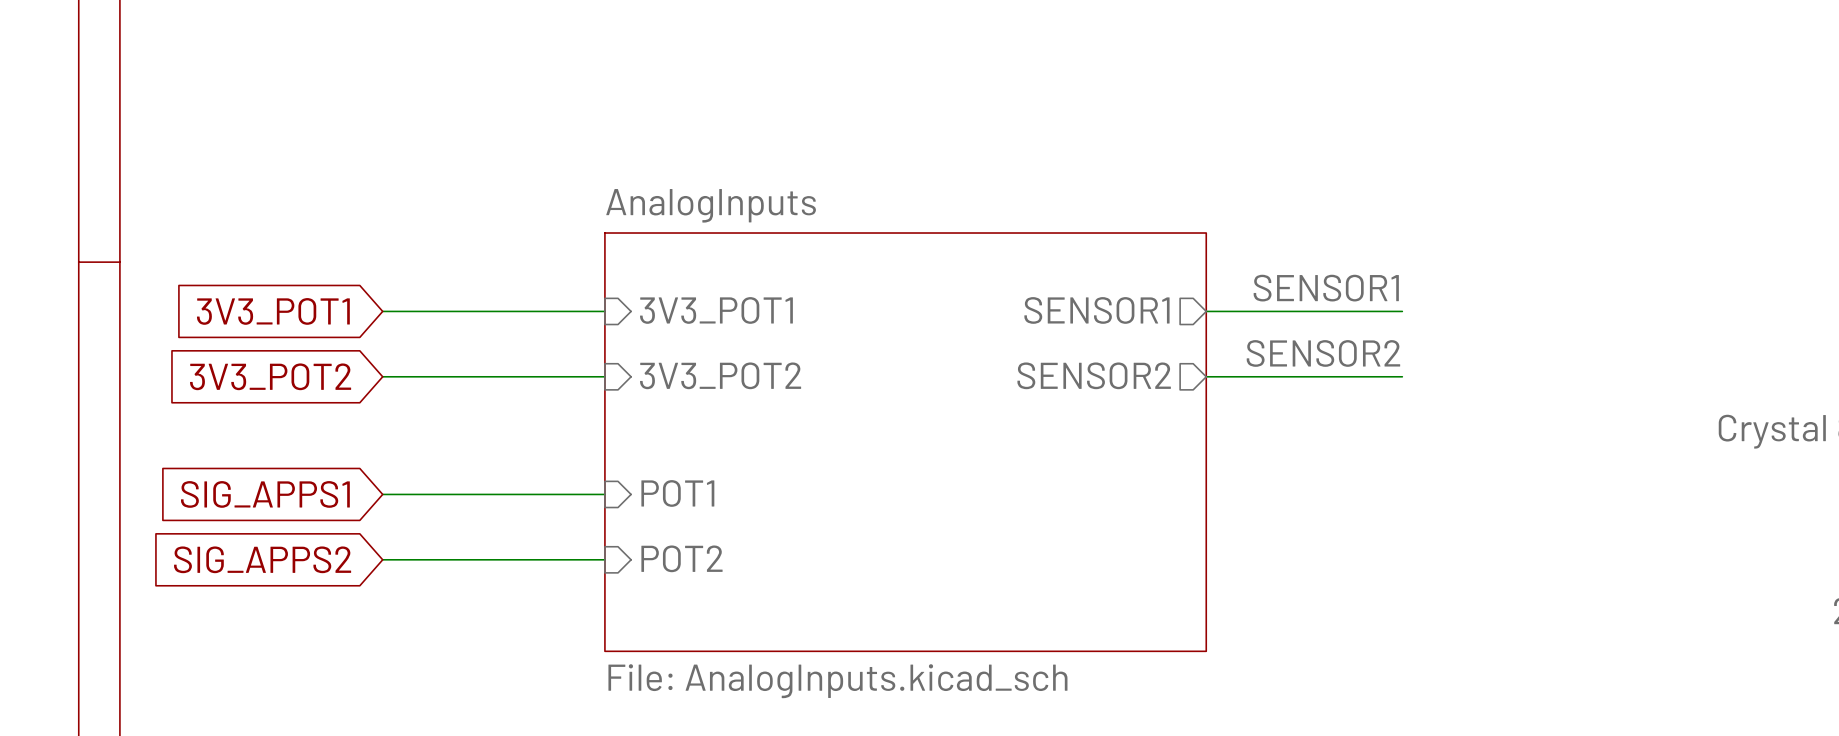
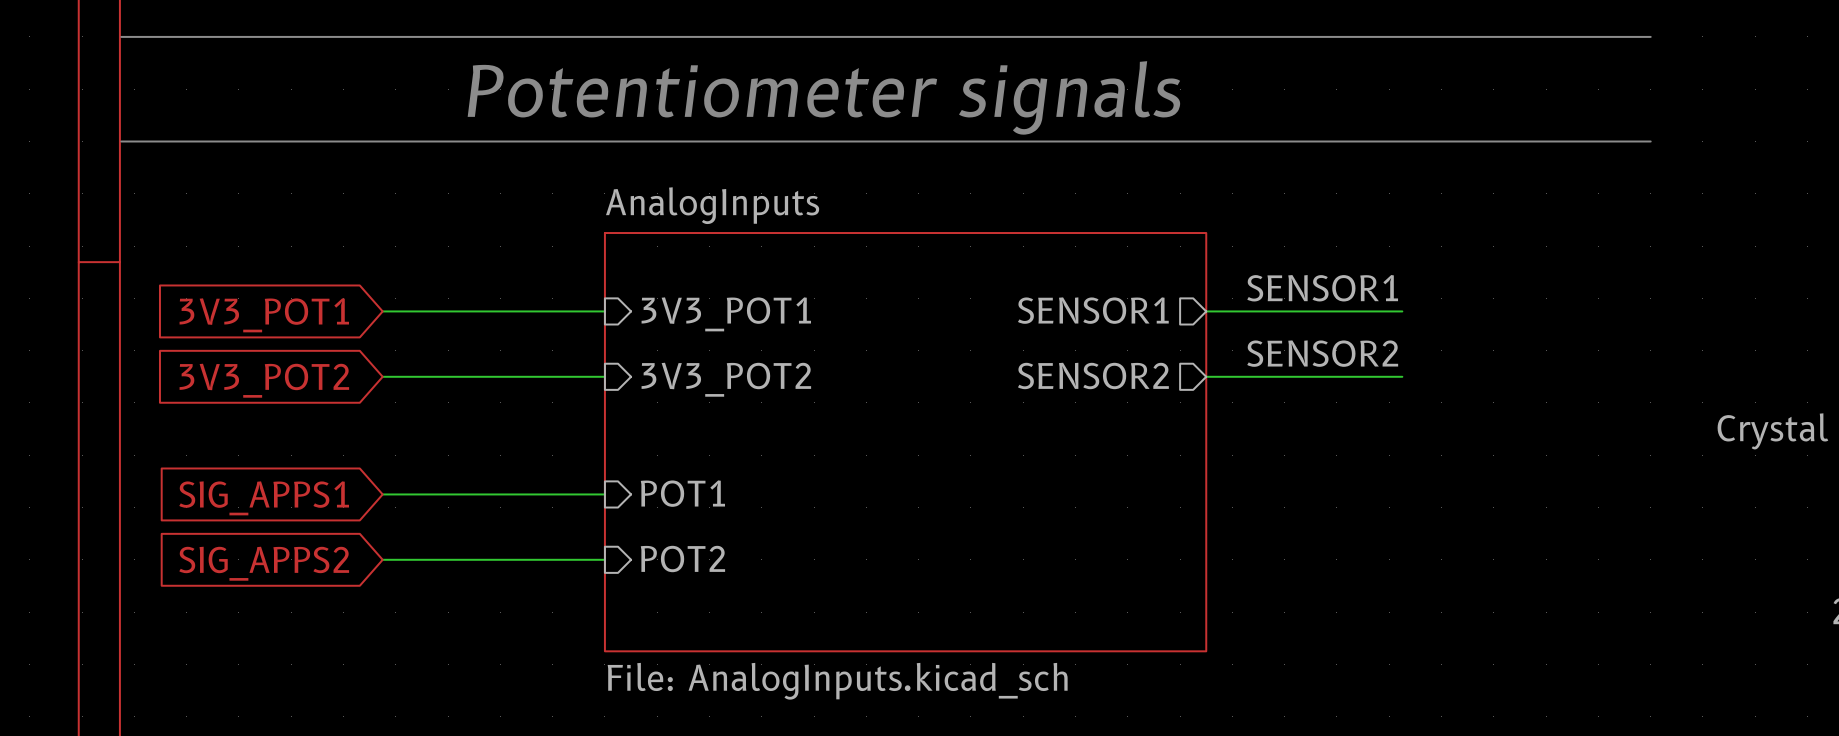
line: none -> (121, 36) (1650, 36)
text: none -> Potentiometer signals (823, 97)
line: none -> (121, 141) (1650, 141)

